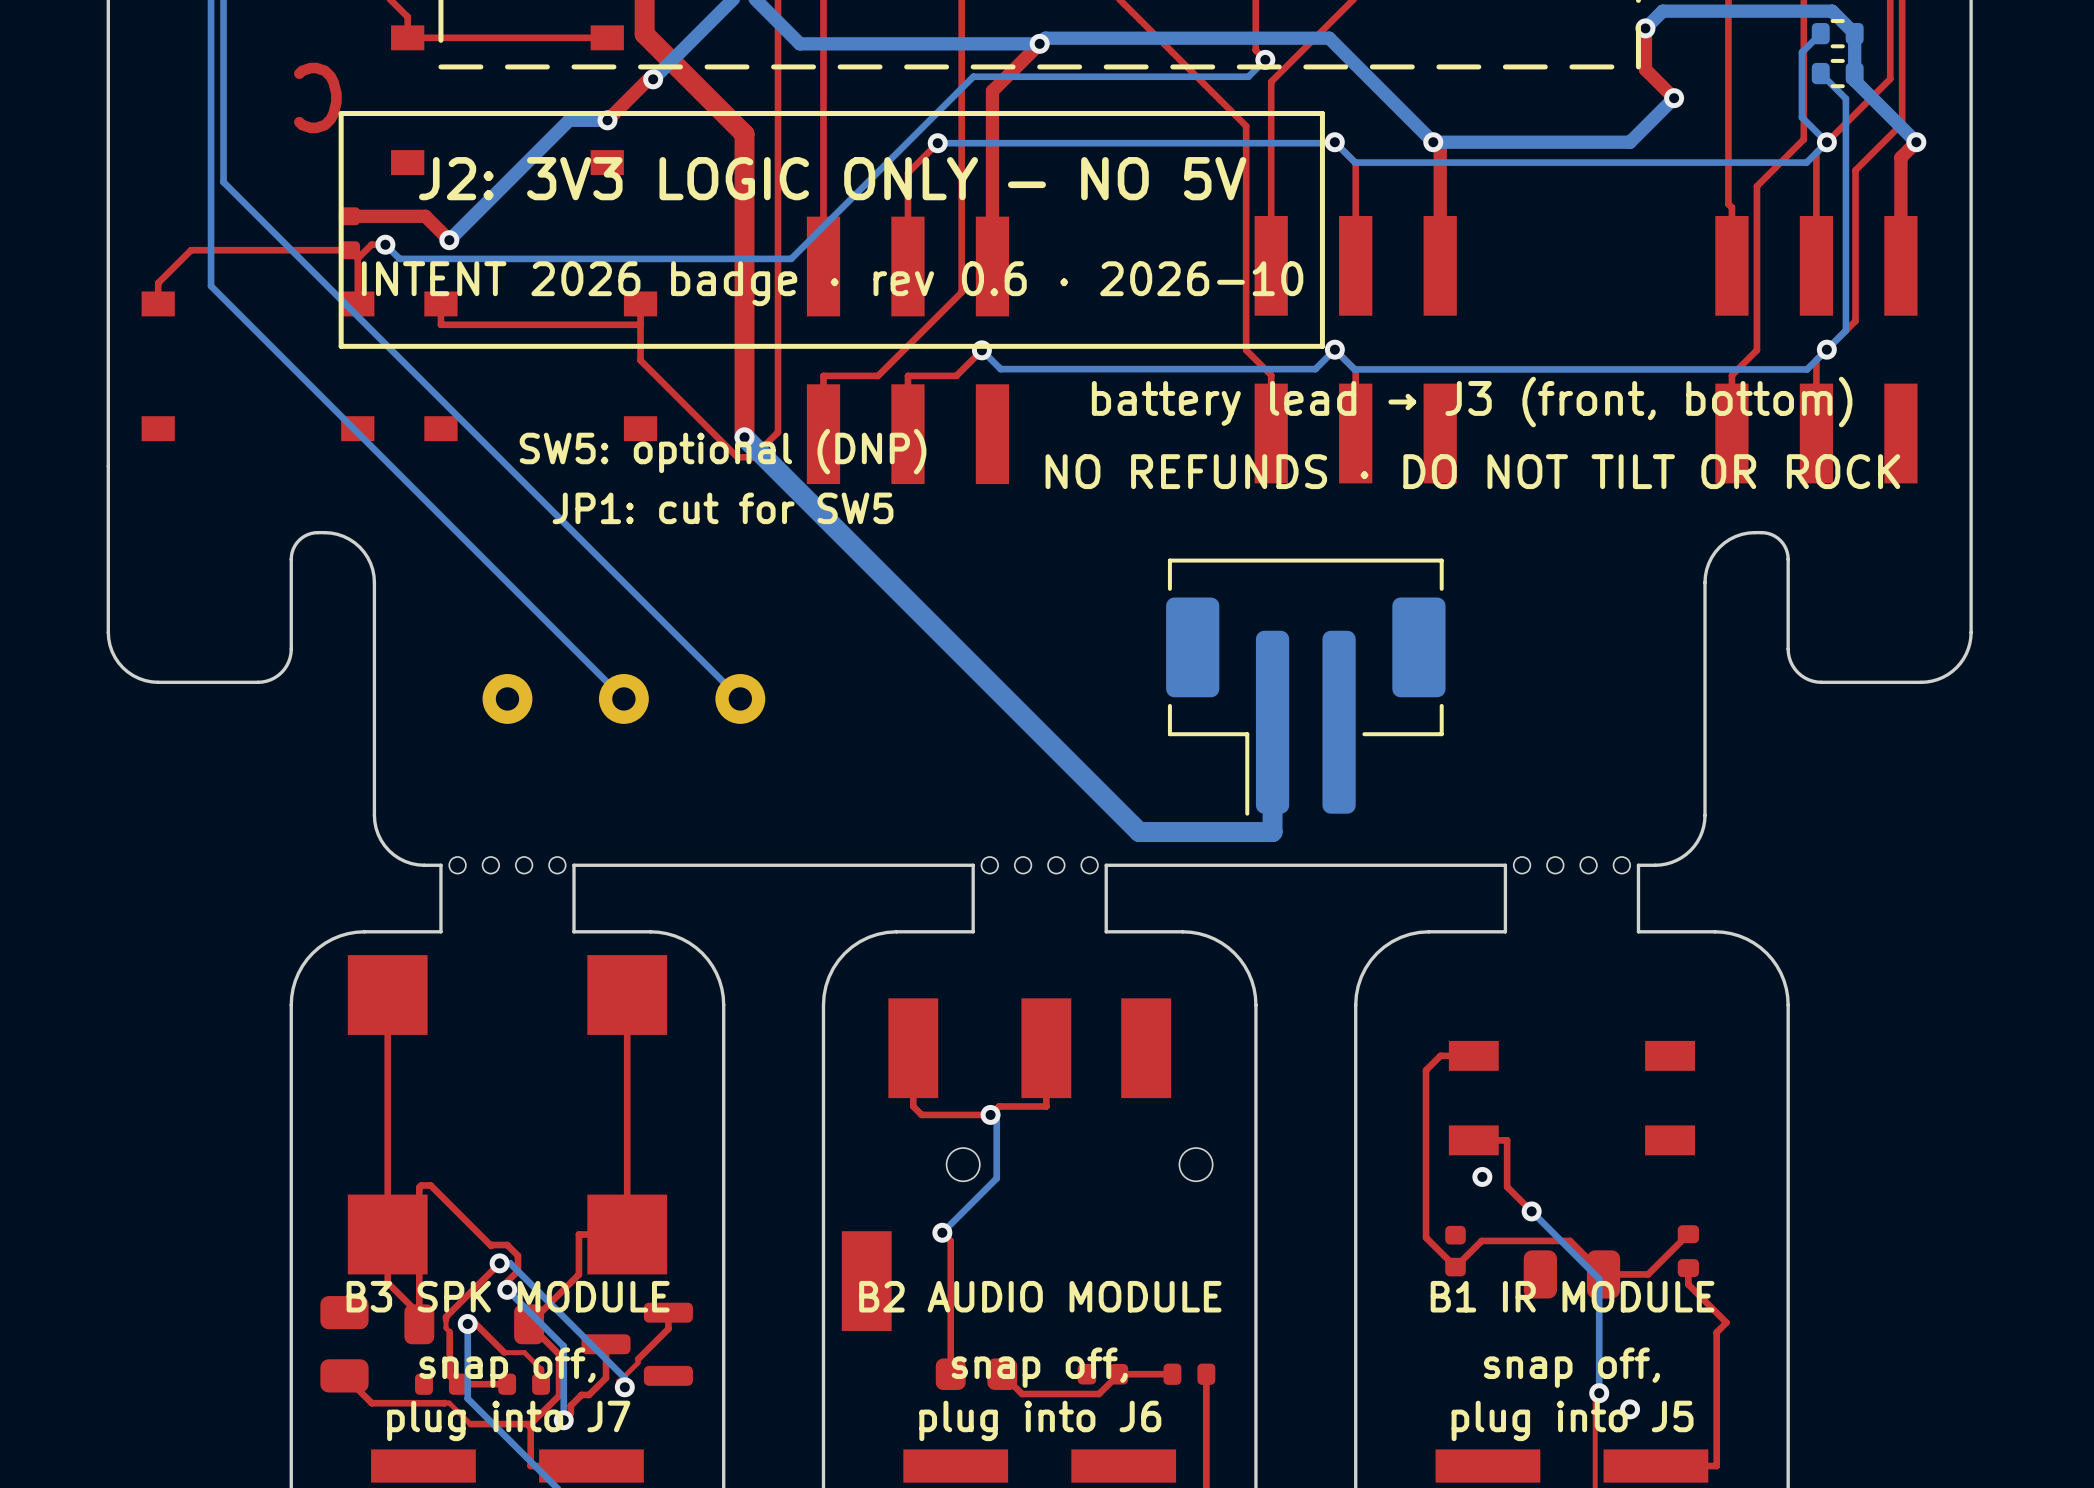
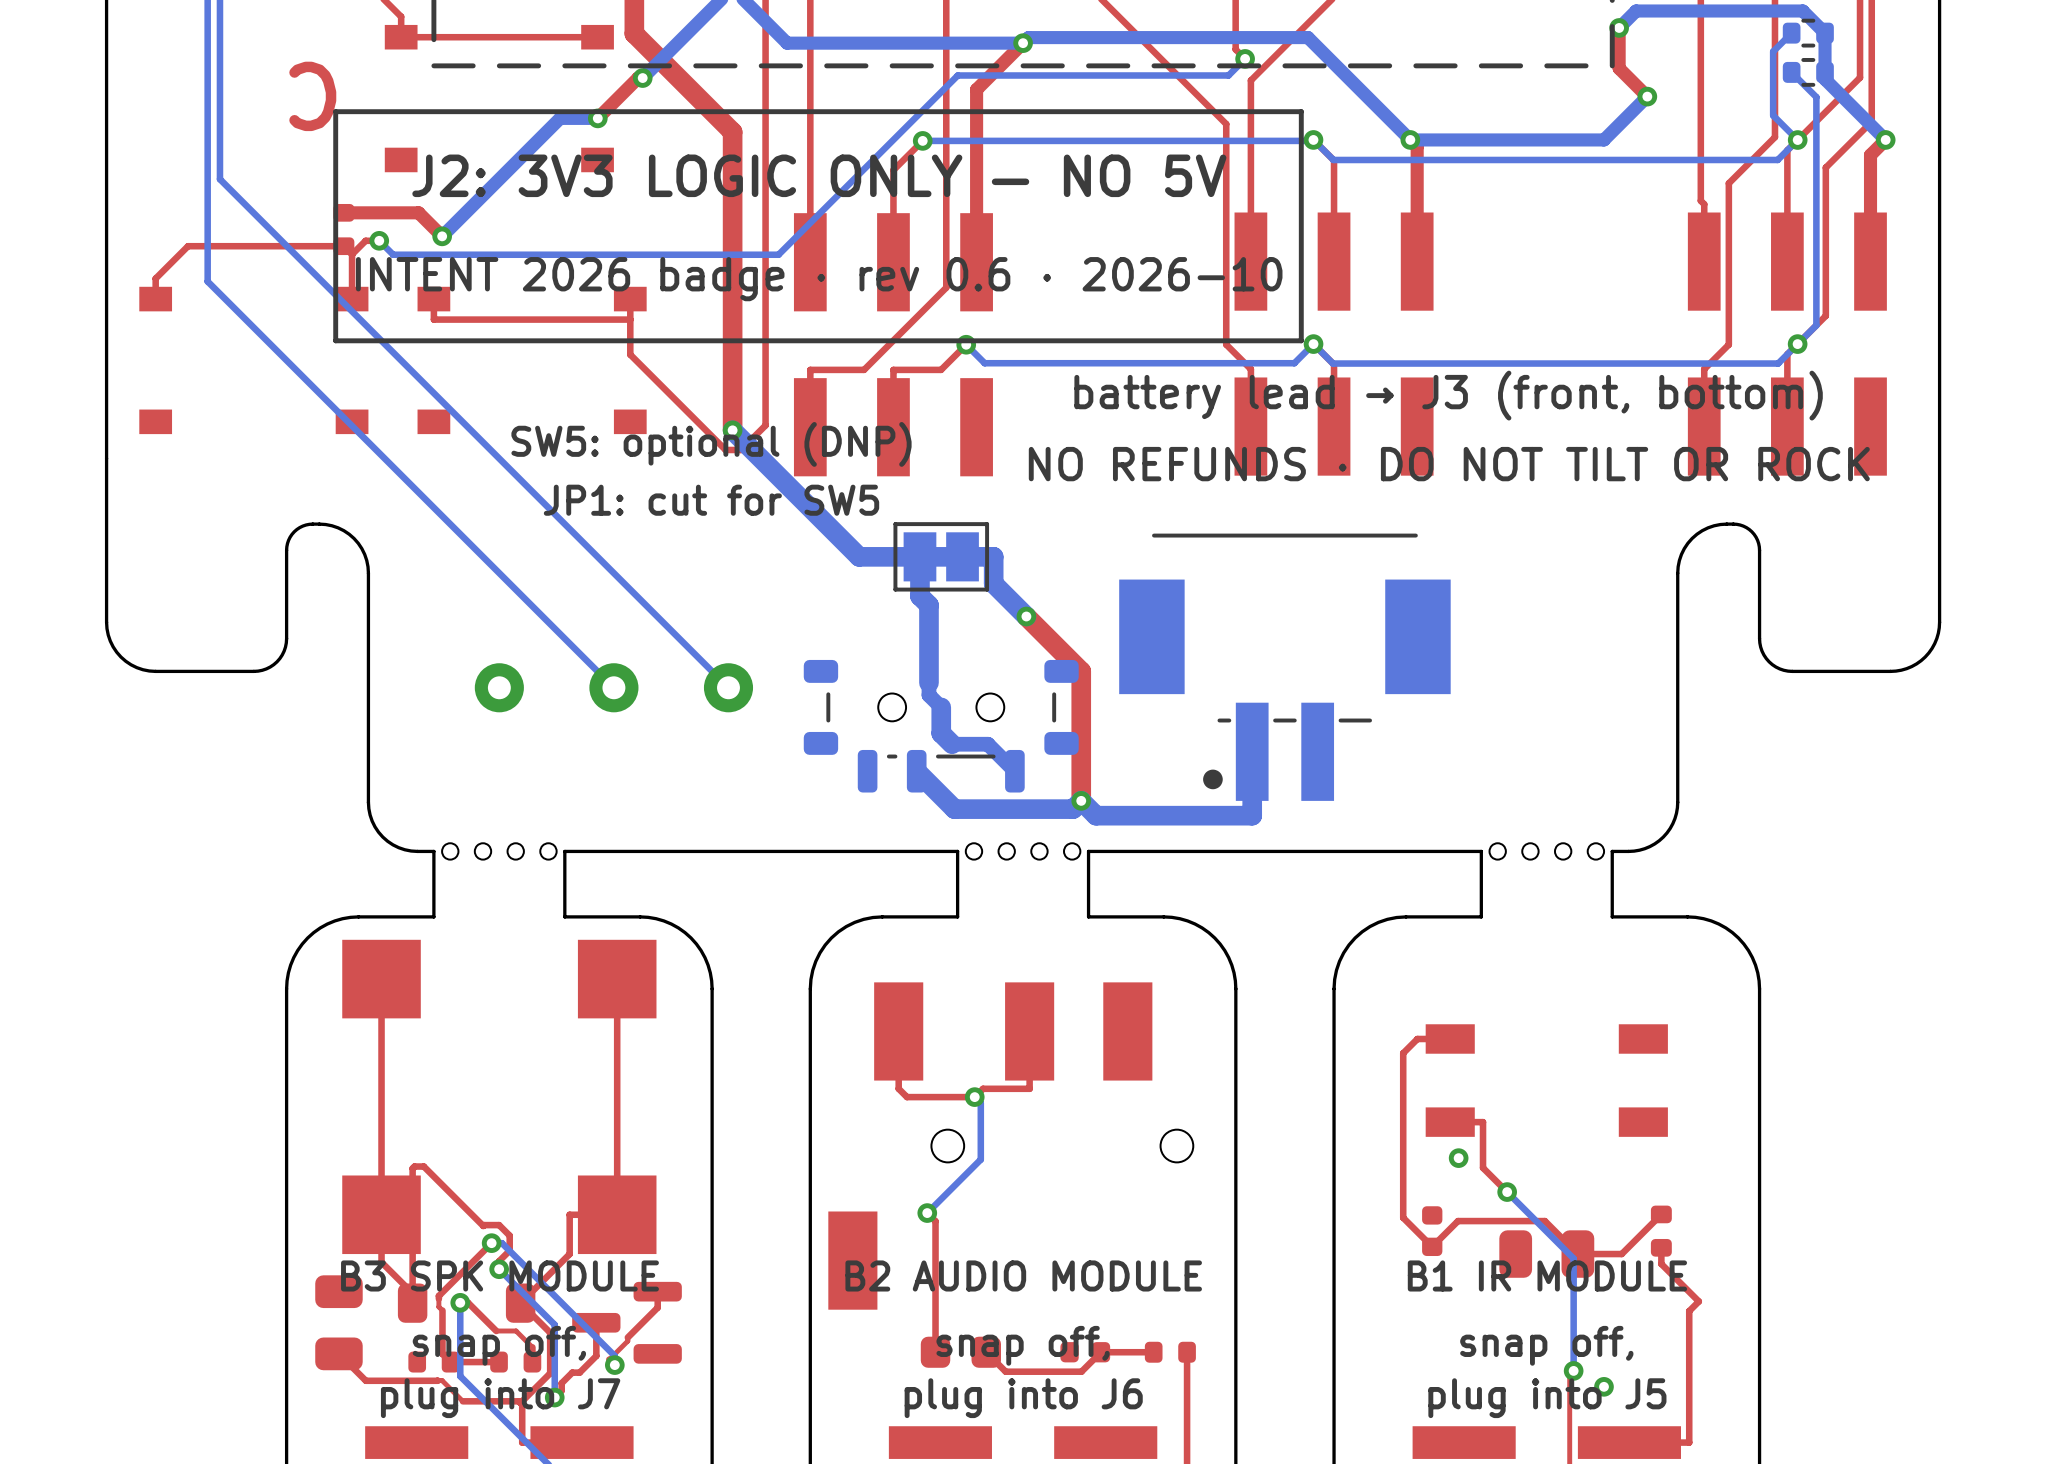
part footprint: [1166, 558, 1446, 816] -> [1119, 533, 1451, 801]
bottom track: (873, 565) (1139, 832) (1272, 832) (1272, 828) -> (916, 771) (954, 809) (1072, 809) (1081, 800) (1096, 815) (1252, 815)
bottom track: none -> (859, 556) (919, 556) (919, 596) (928, 605) (928, 695) (941, 707) (941, 733) (952, 744) (987, 744) (1014, 771)
part: none -> (941, 556)
bottom track: none -> (962, 556) (993, 556) (993, 583) (1026, 616)
top track: none -> (1026, 616) (1081, 671) (1081, 800)
via: none -> (1026, 616)
part: none -> (941, 726)
via: none -> (1081, 800)

